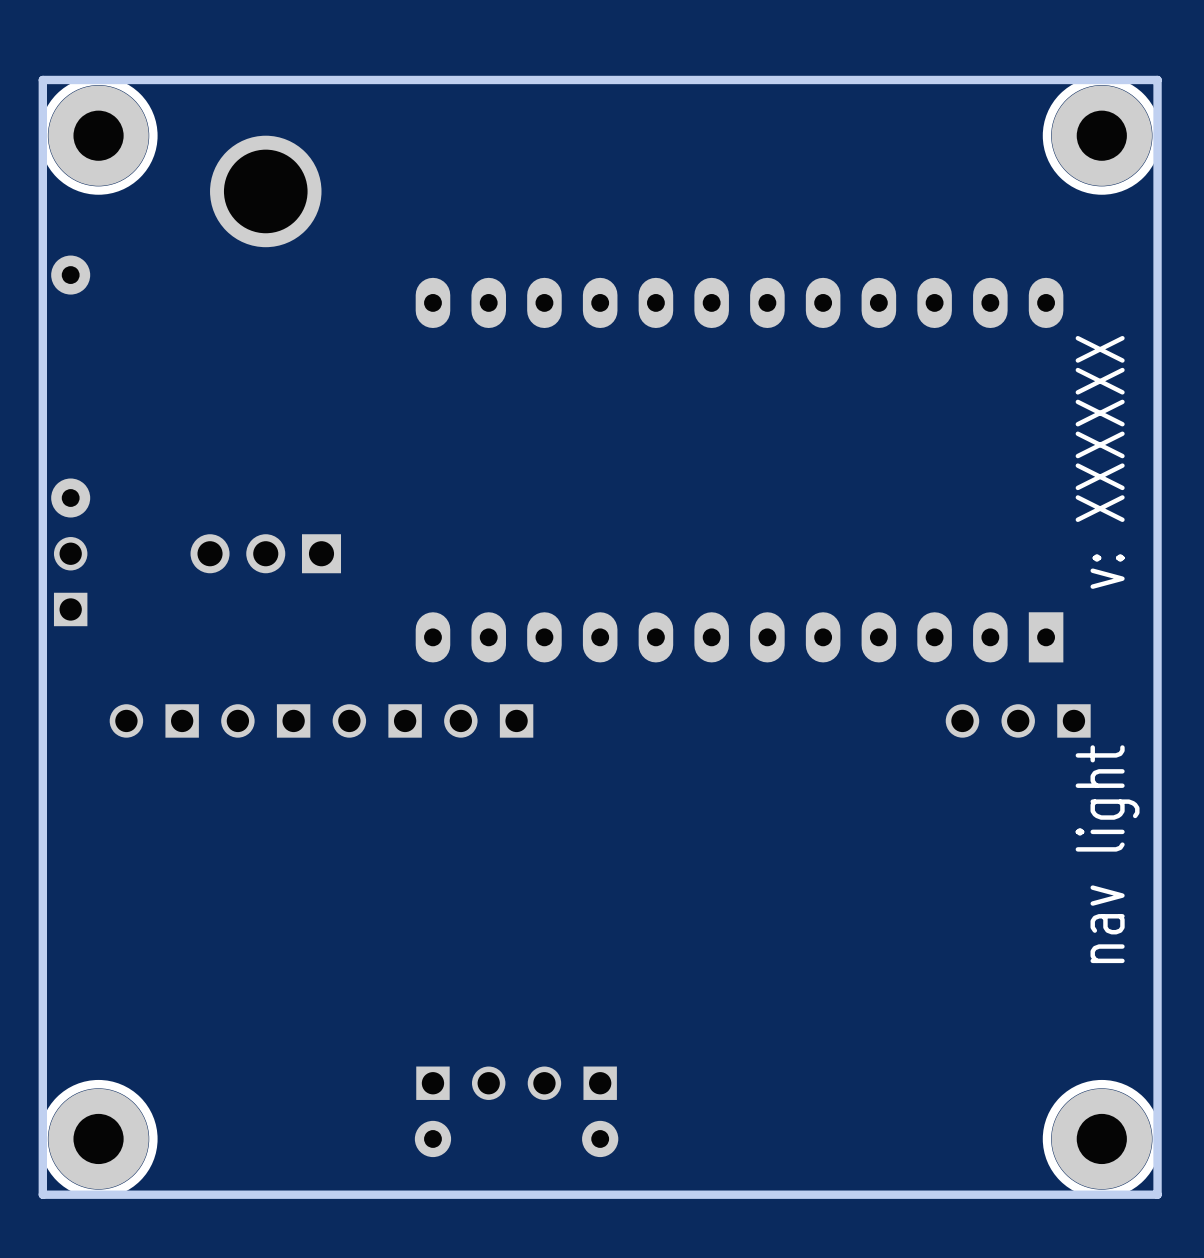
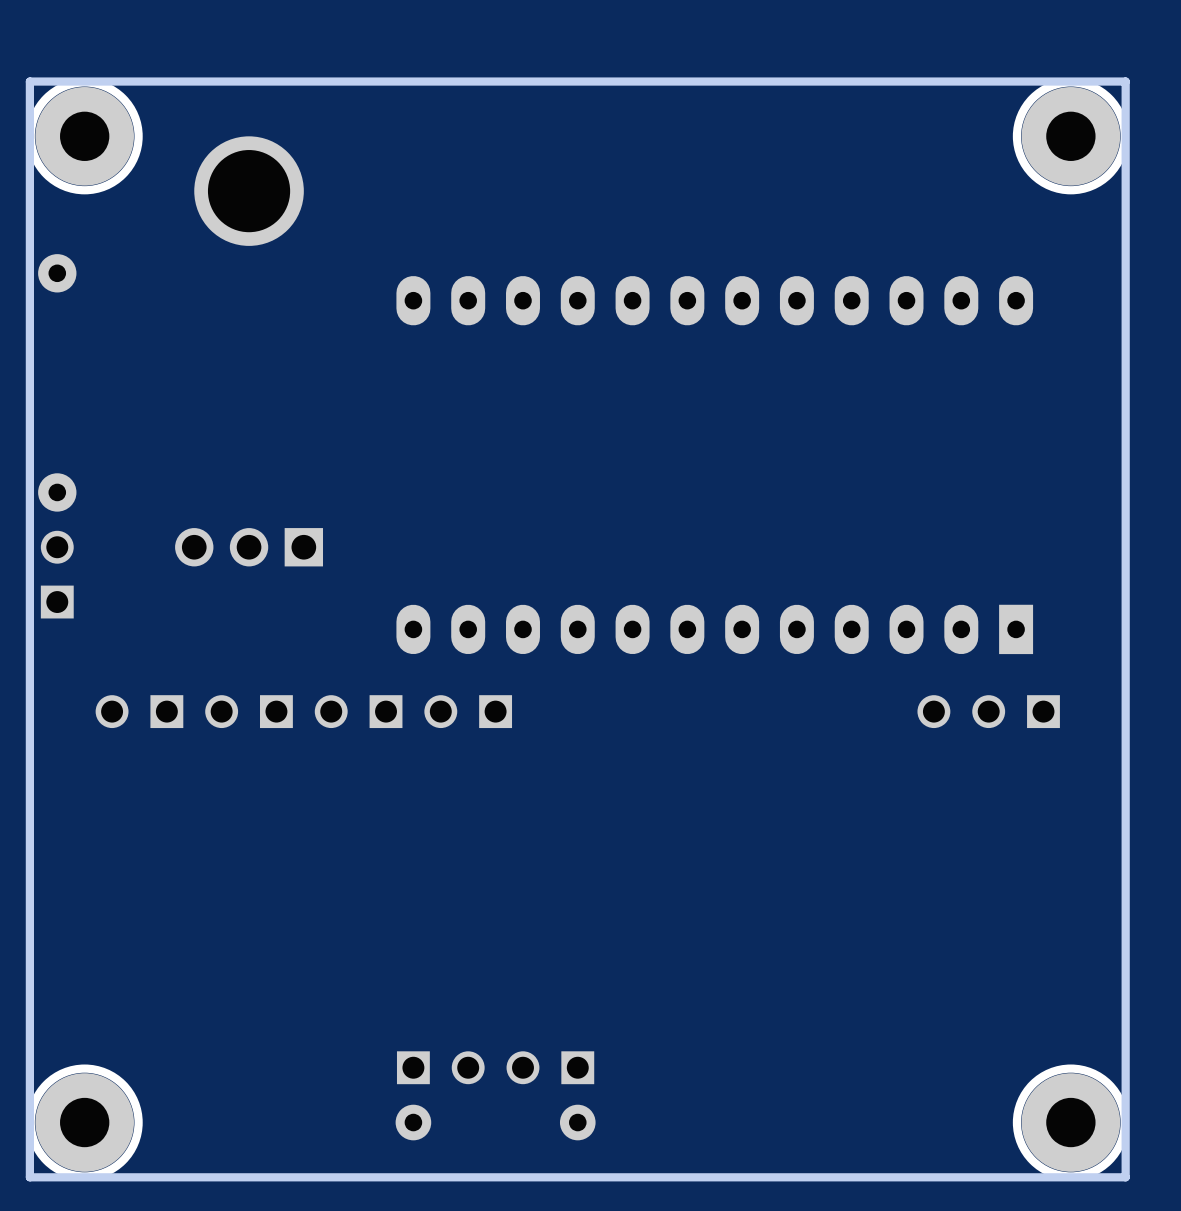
text: nav light v: XXXXXX (1107, 649) -> none

